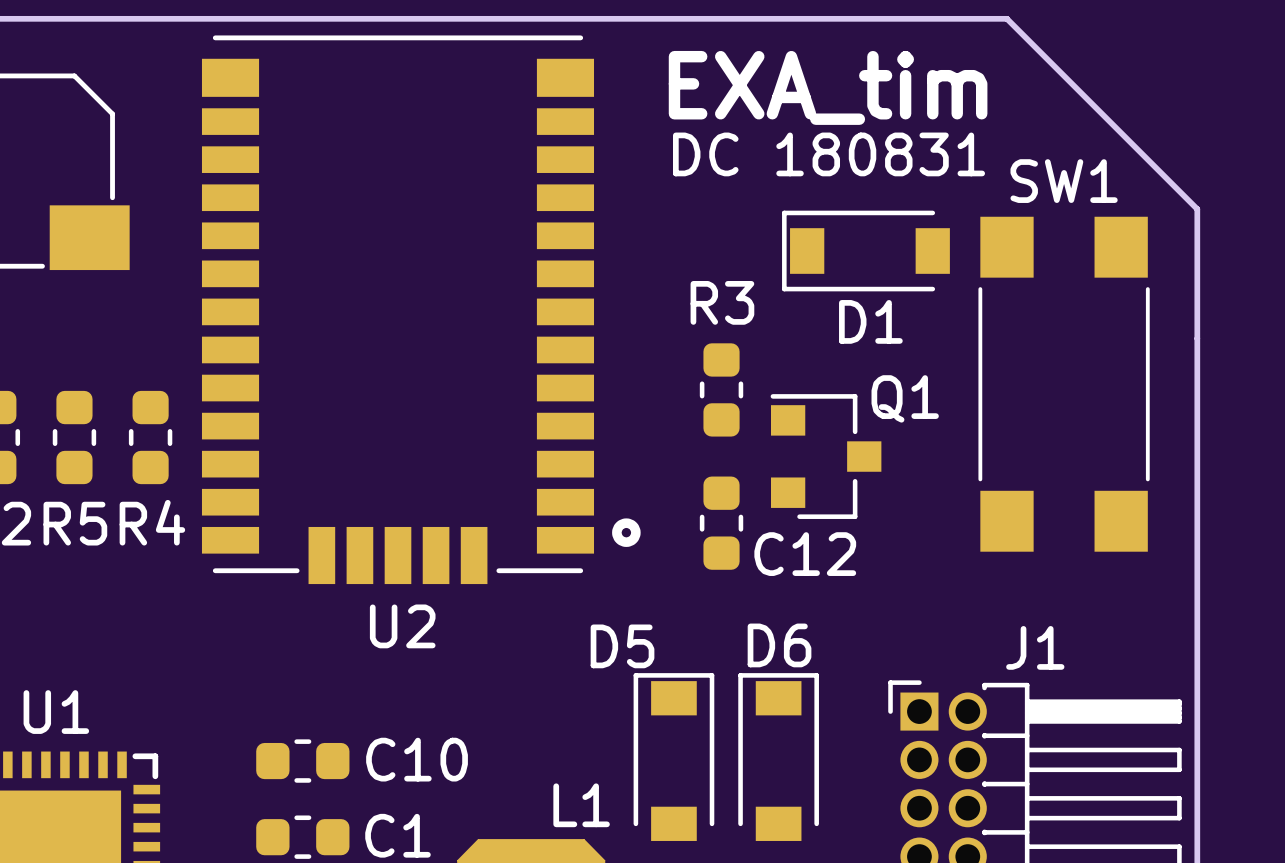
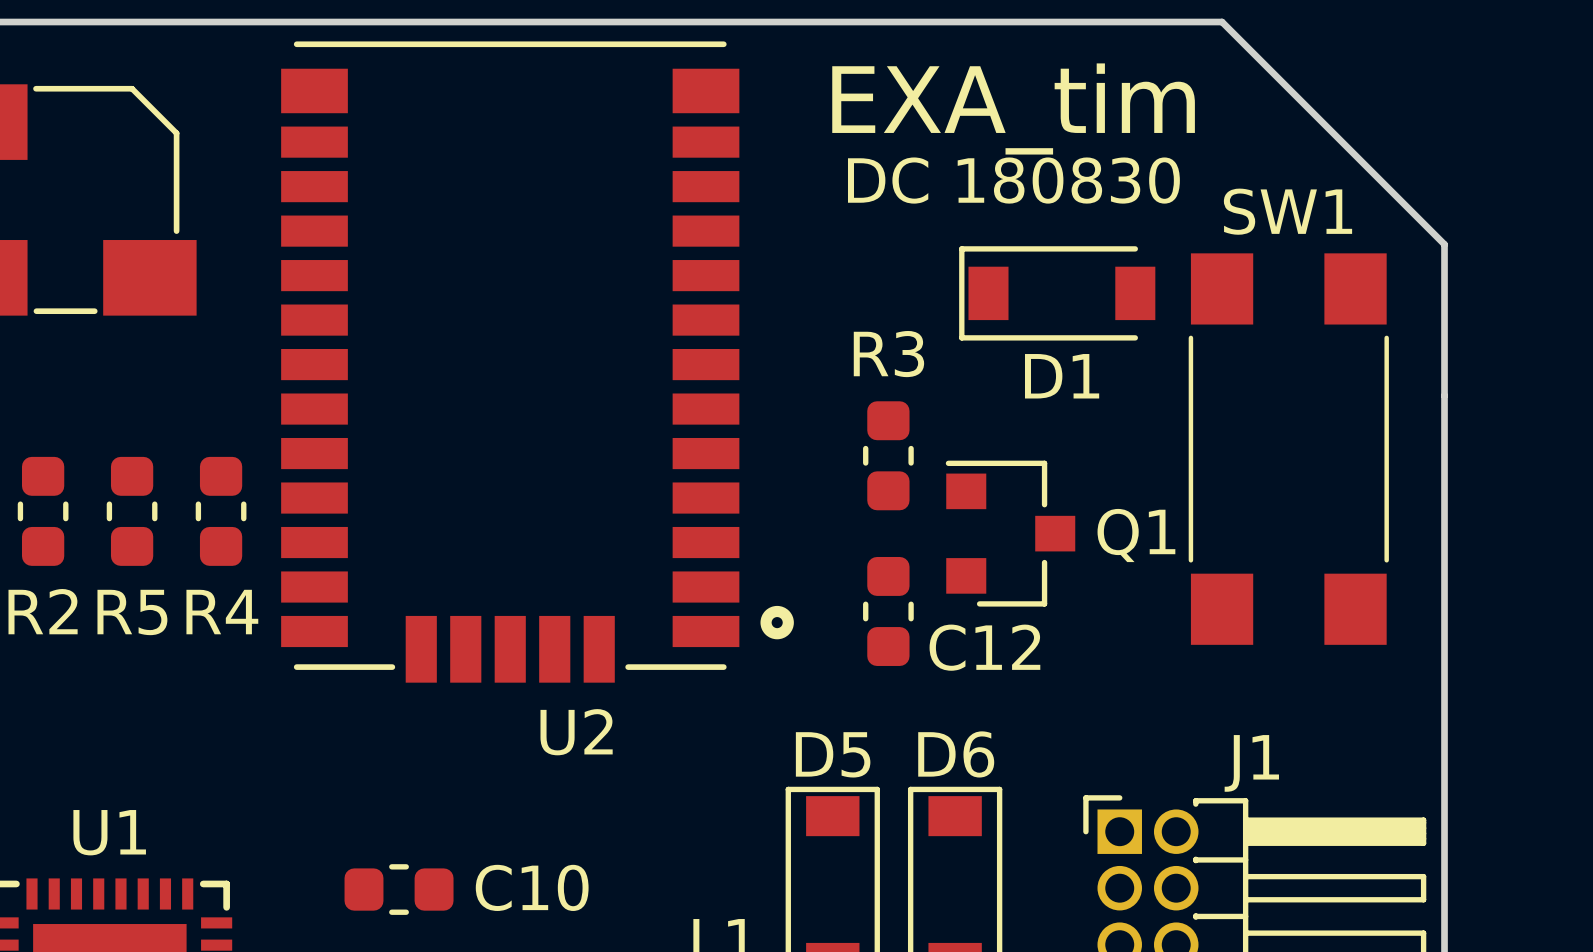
text: DC 180831 (829, 154) -> DC 180830 (1013, 180)
Q1 name position: Q1 (905, 398) -> Q1 (1136, 535)
U2 name position: U2 (402, 626) -> U2 (576, 732)
D5 name position: D5 (622, 646) -> D5 (833, 754)

